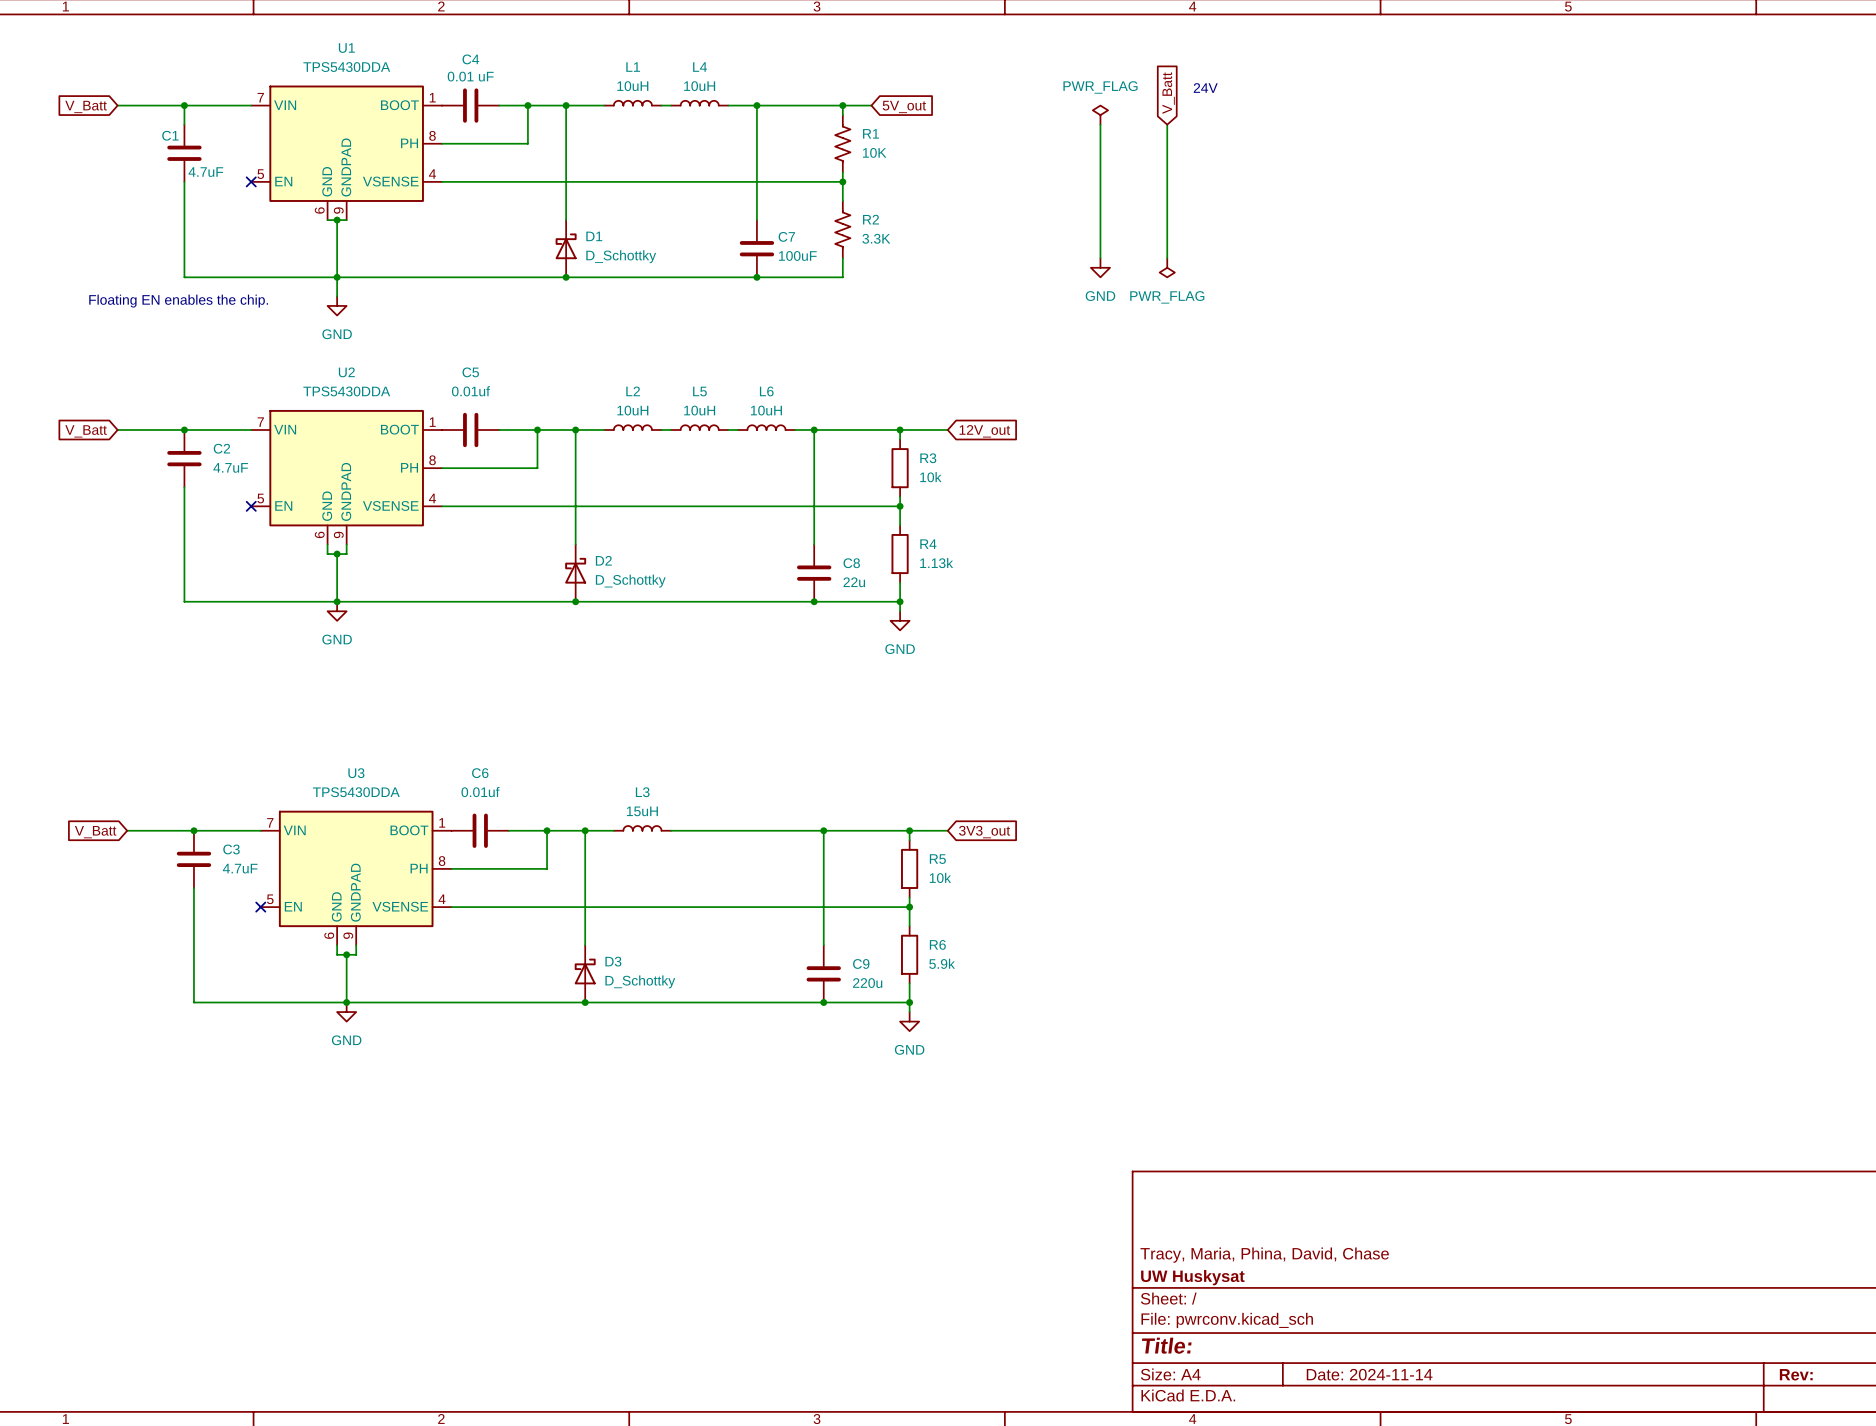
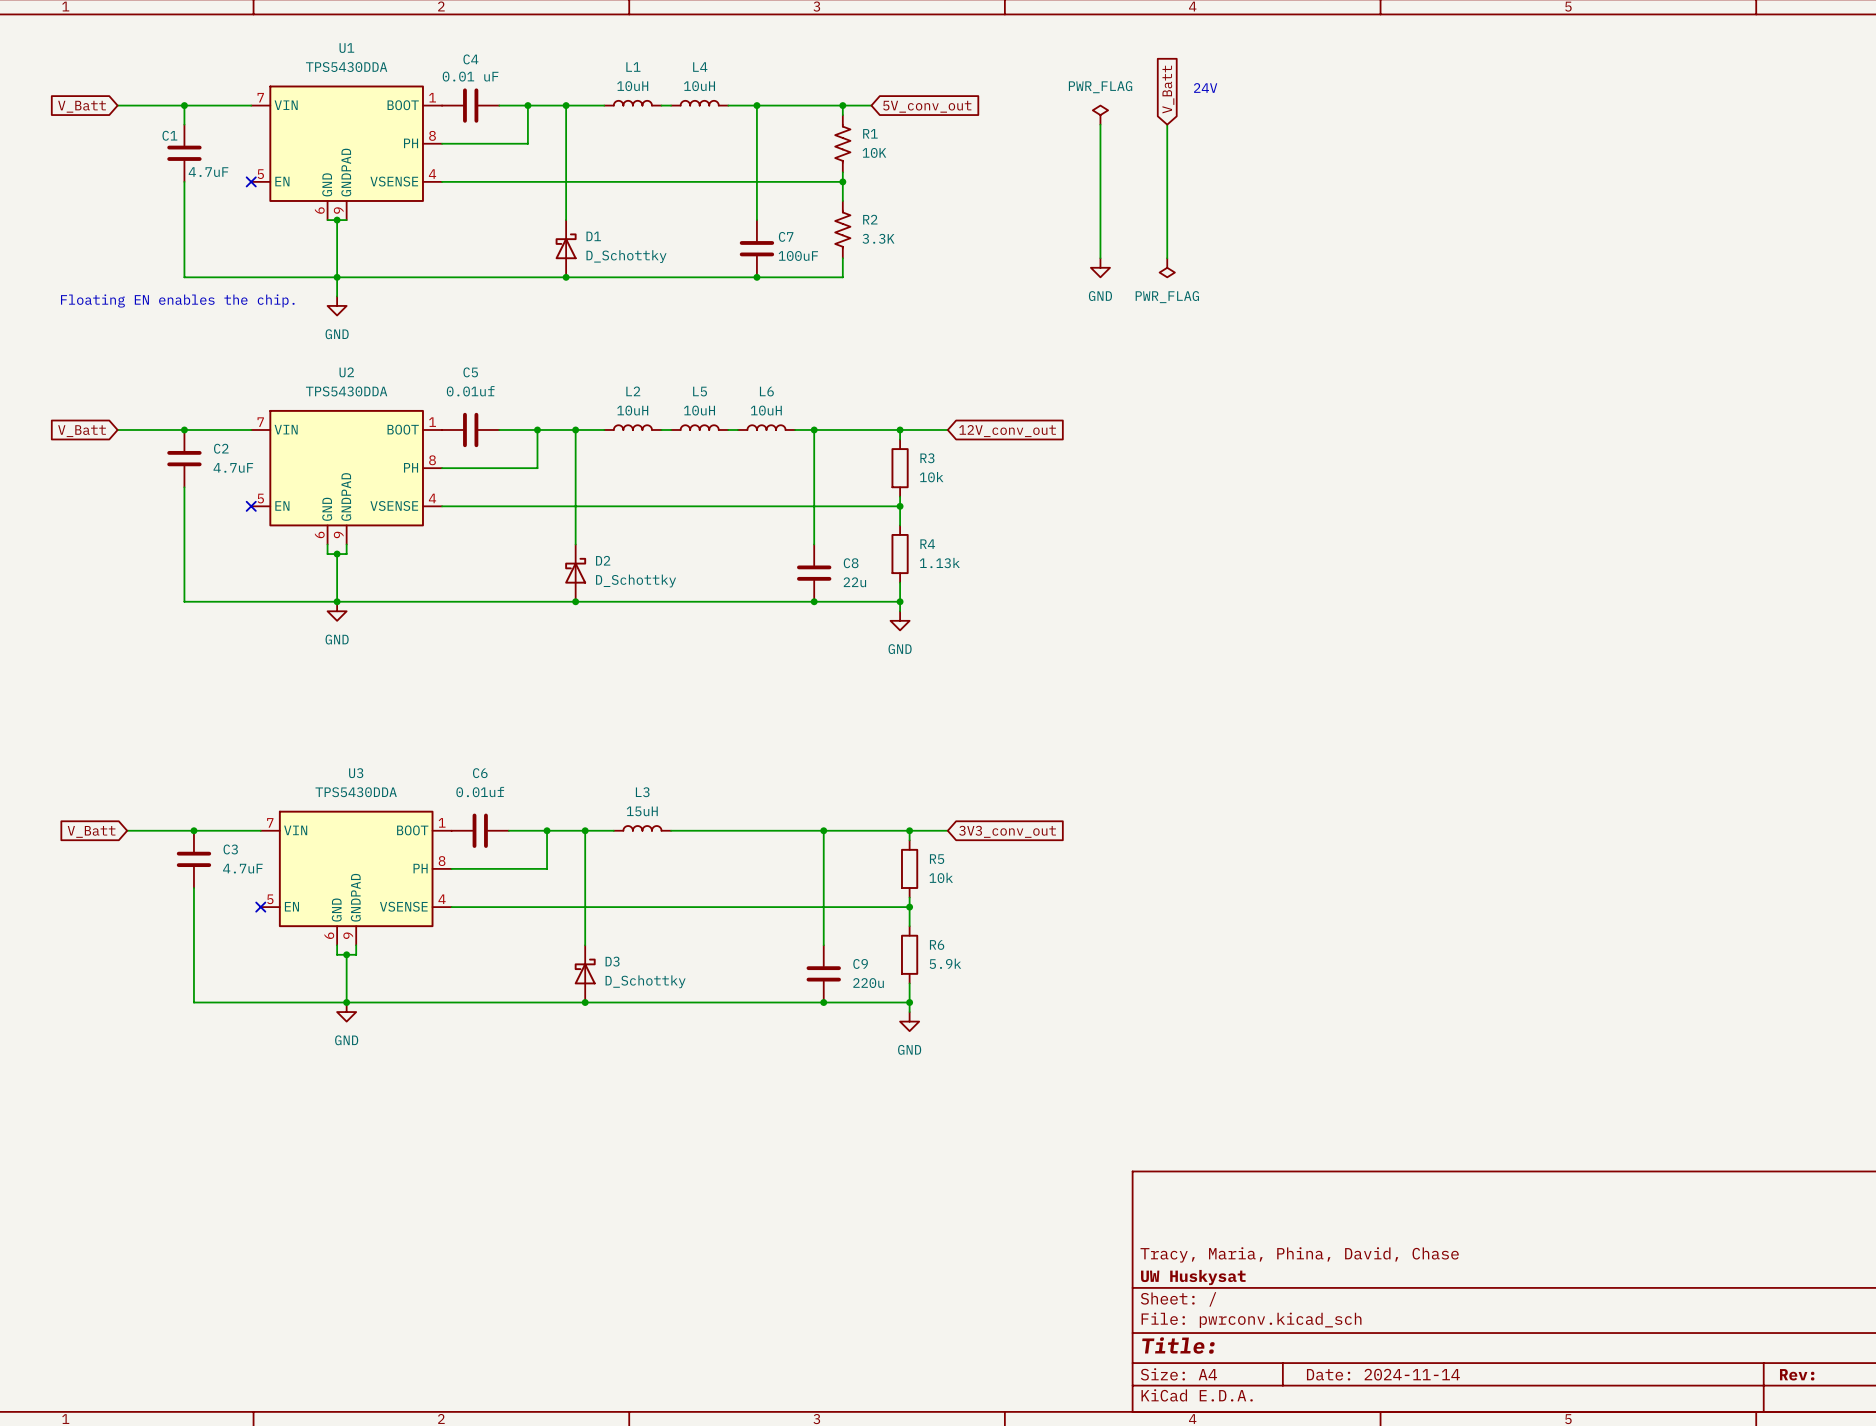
global label: 5V_out (904, 106) -> 5V_conv_out (927, 106)
global label: 12V_out (984, 431) -> 12V_conv_out (1007, 431)
global label: 3V3_out (984, 832) -> 3V3_conv_out (1007, 831)

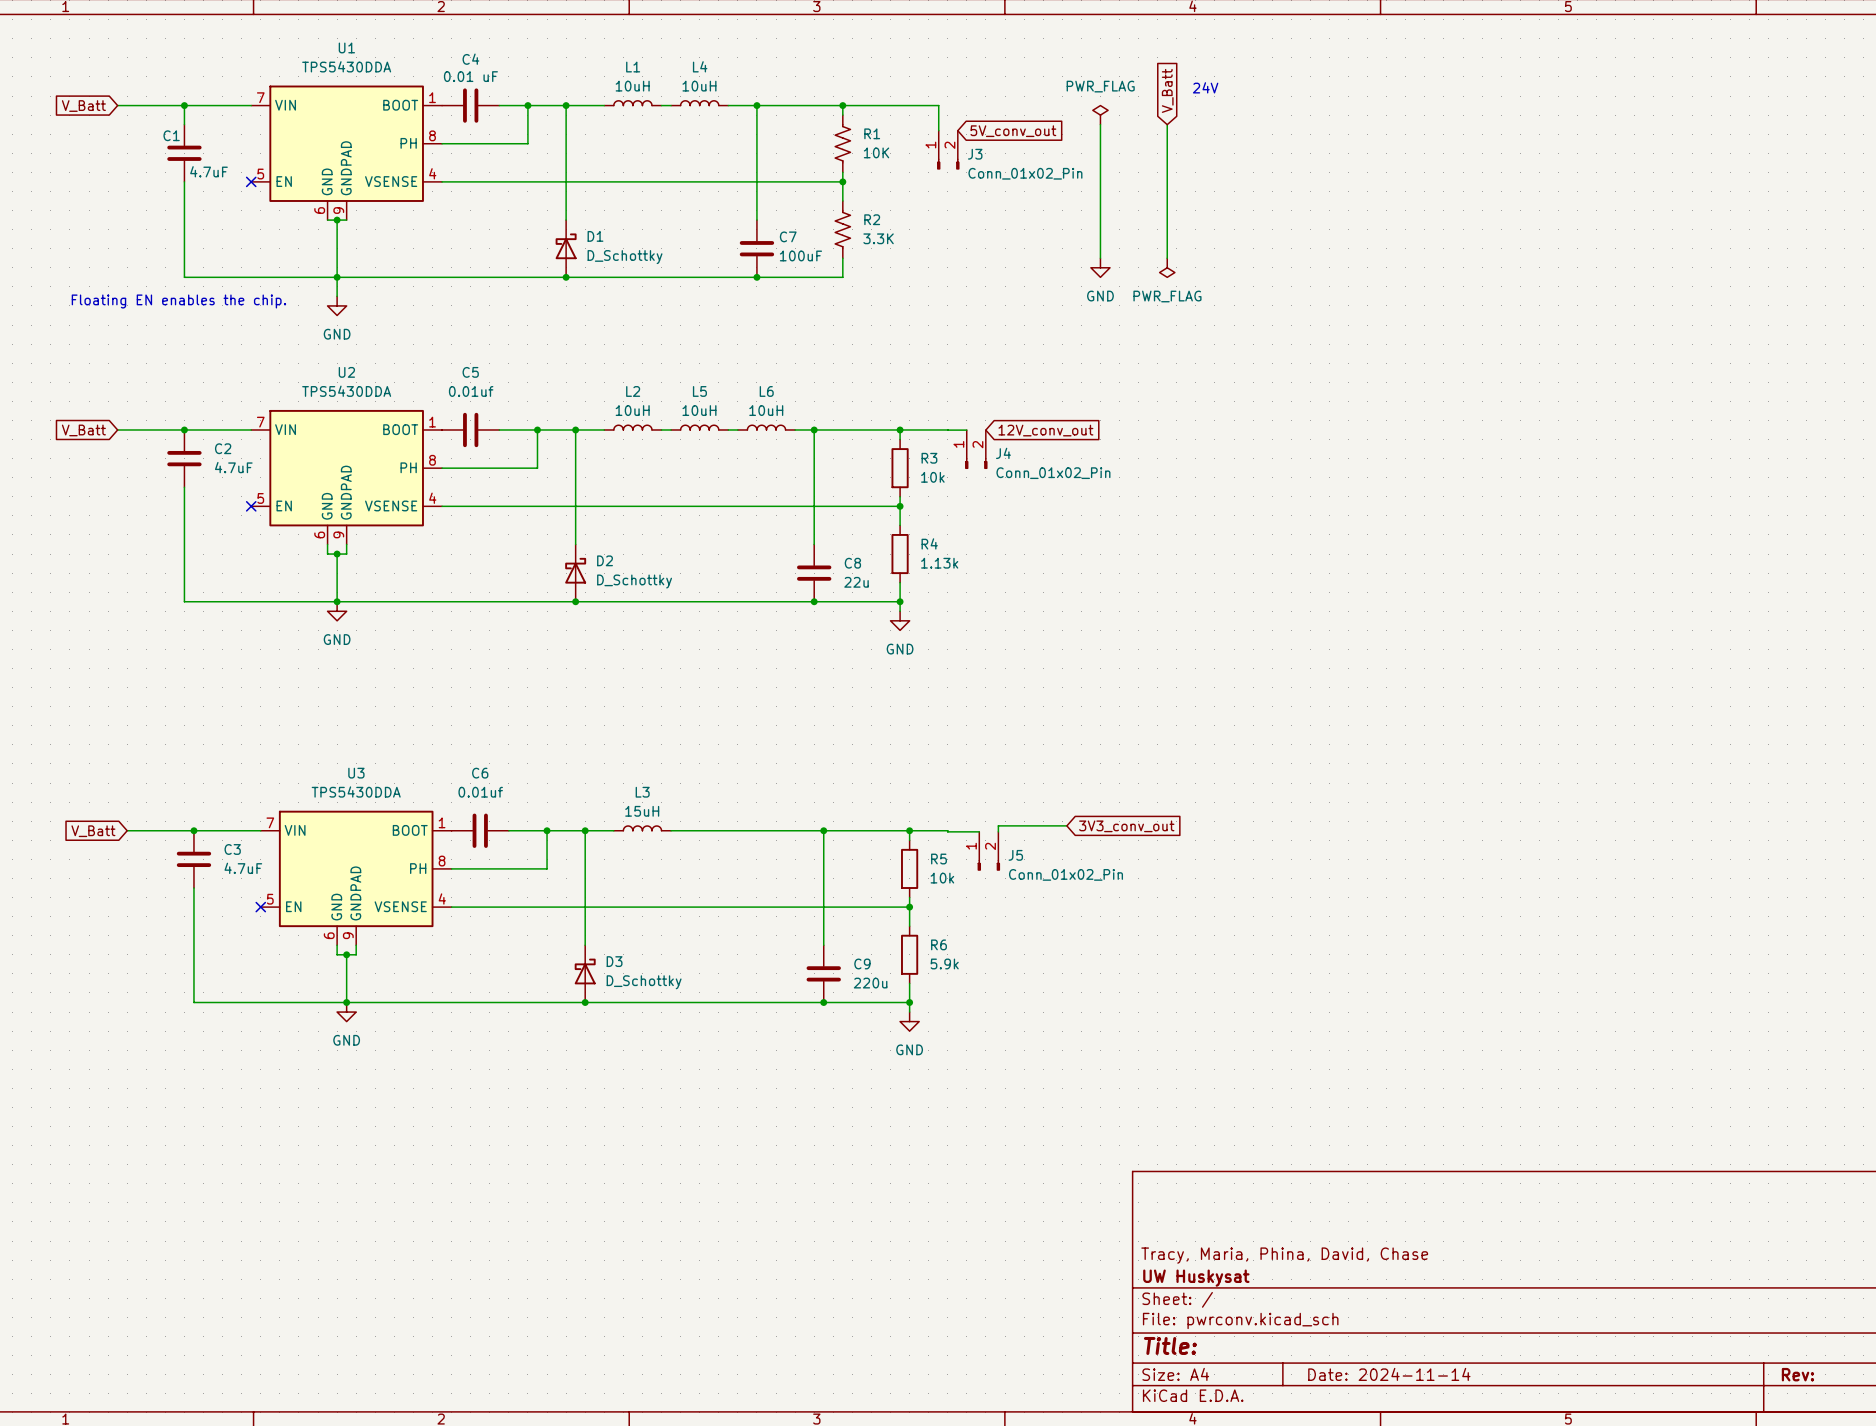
wire: none -> (871, 105) (938, 105) (938, 130)
global label position: 5V_conv_out (927, 106) -> 5V_conv_out (1013, 131)
J3: none -> Conn_01x02_Pin (948, 150)
wire: none -> (947, 430) (966, 430)
global label position: 12V_conv_out (1007, 431) -> 12V_conv_out (1045, 430)
J4: none -> Conn_01x02_Pin (976, 449)
wire: none -> (1066, 825) (998, 825) (998, 831)
wire: none -> (947, 830) (979, 831)
global label position: 3V3_conv_out (1007, 831) -> 3V3_conv_out (1126, 826)
J5: none -> Conn_01x02_Pin (988, 851)

